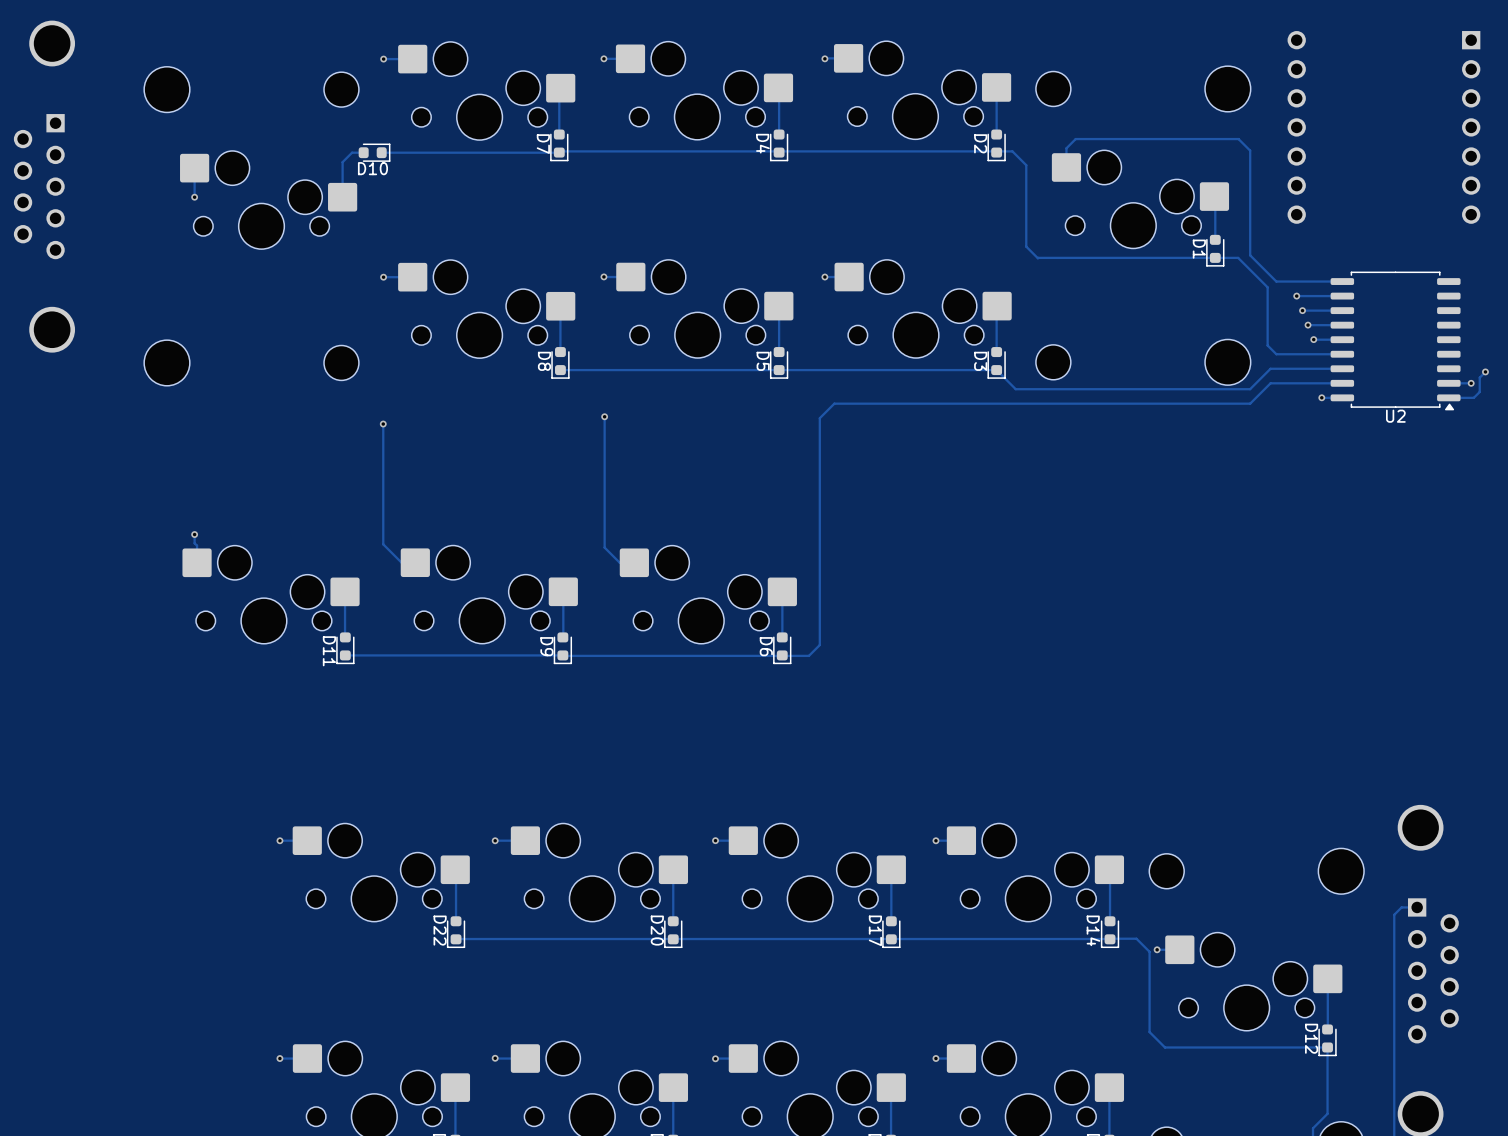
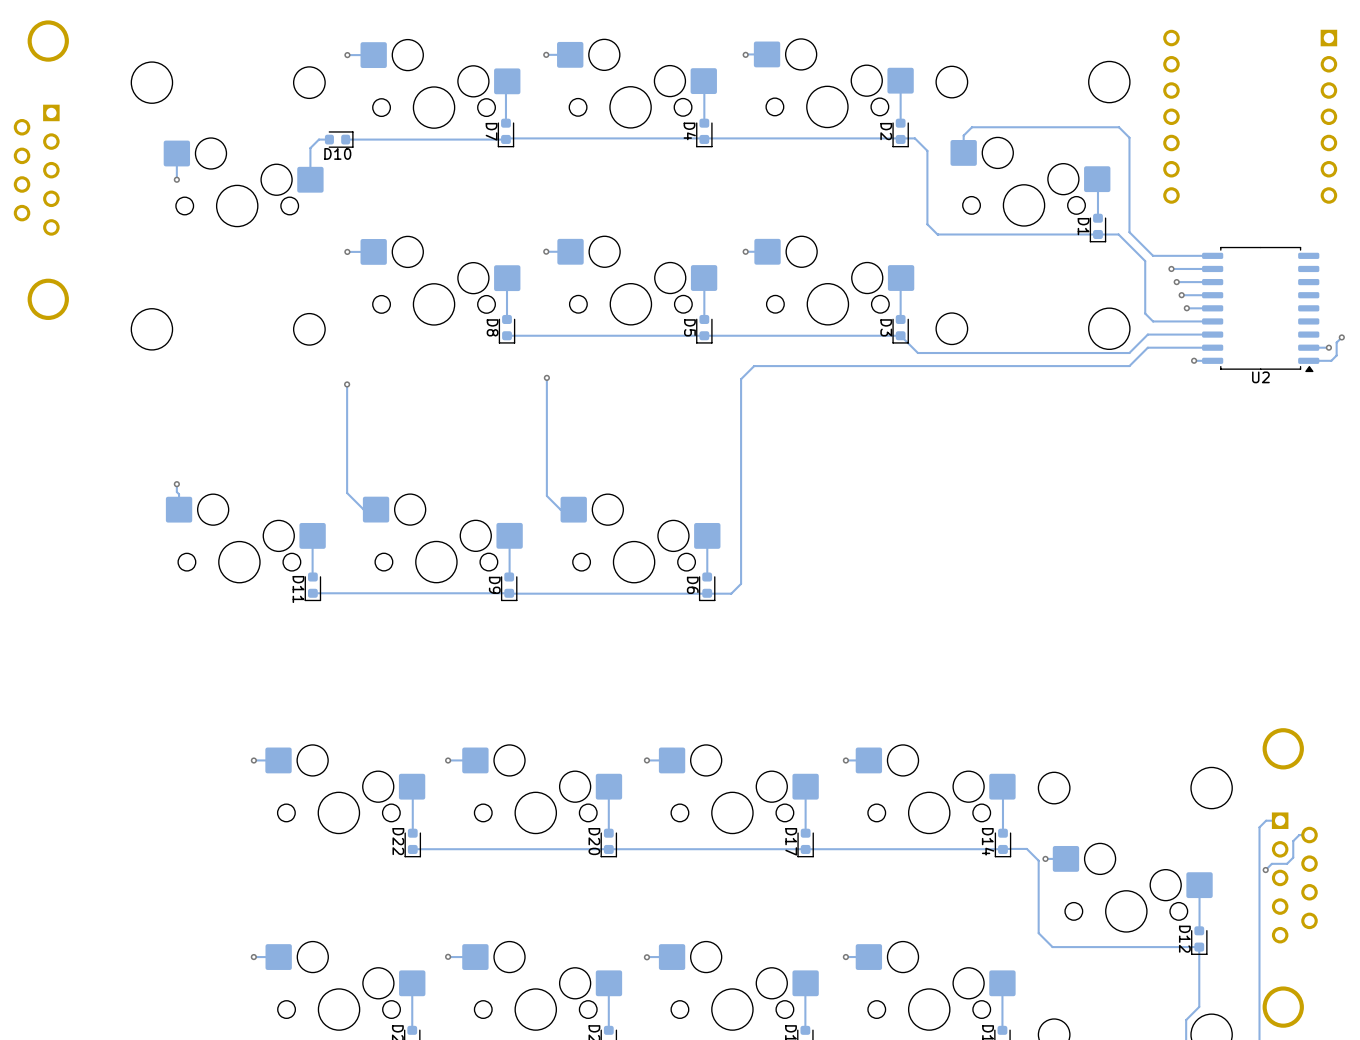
track: none -> (1309, 835) (1299, 835) (1293, 841) (1293, 857) (1287, 863) (1271, 863) (1265, 870)
via: none -> (1265, 870)

